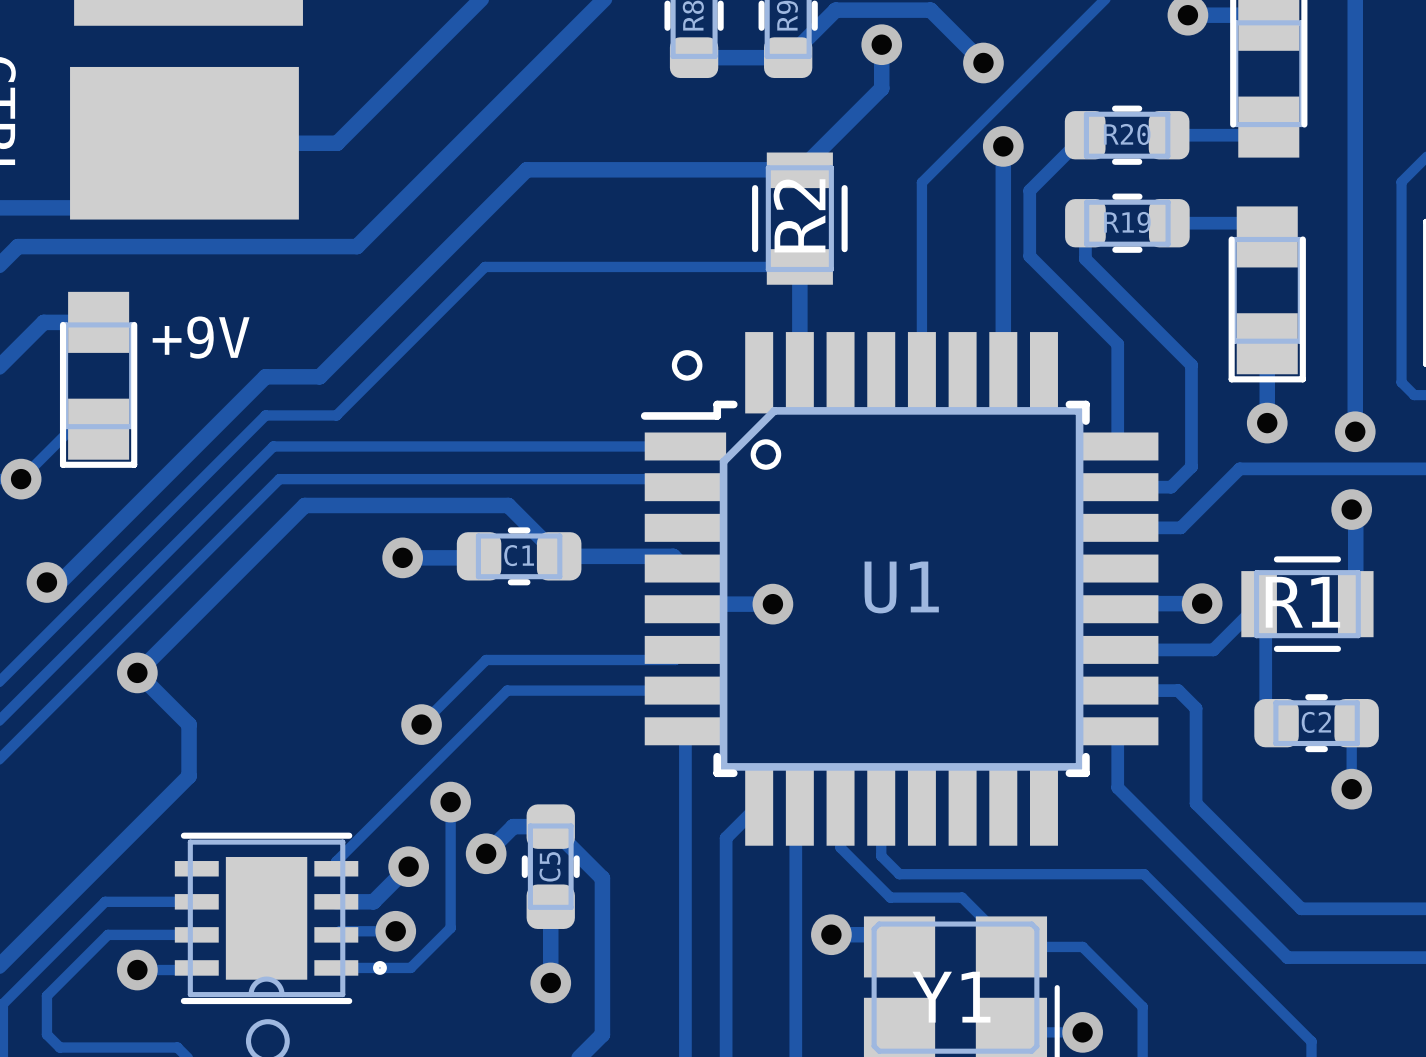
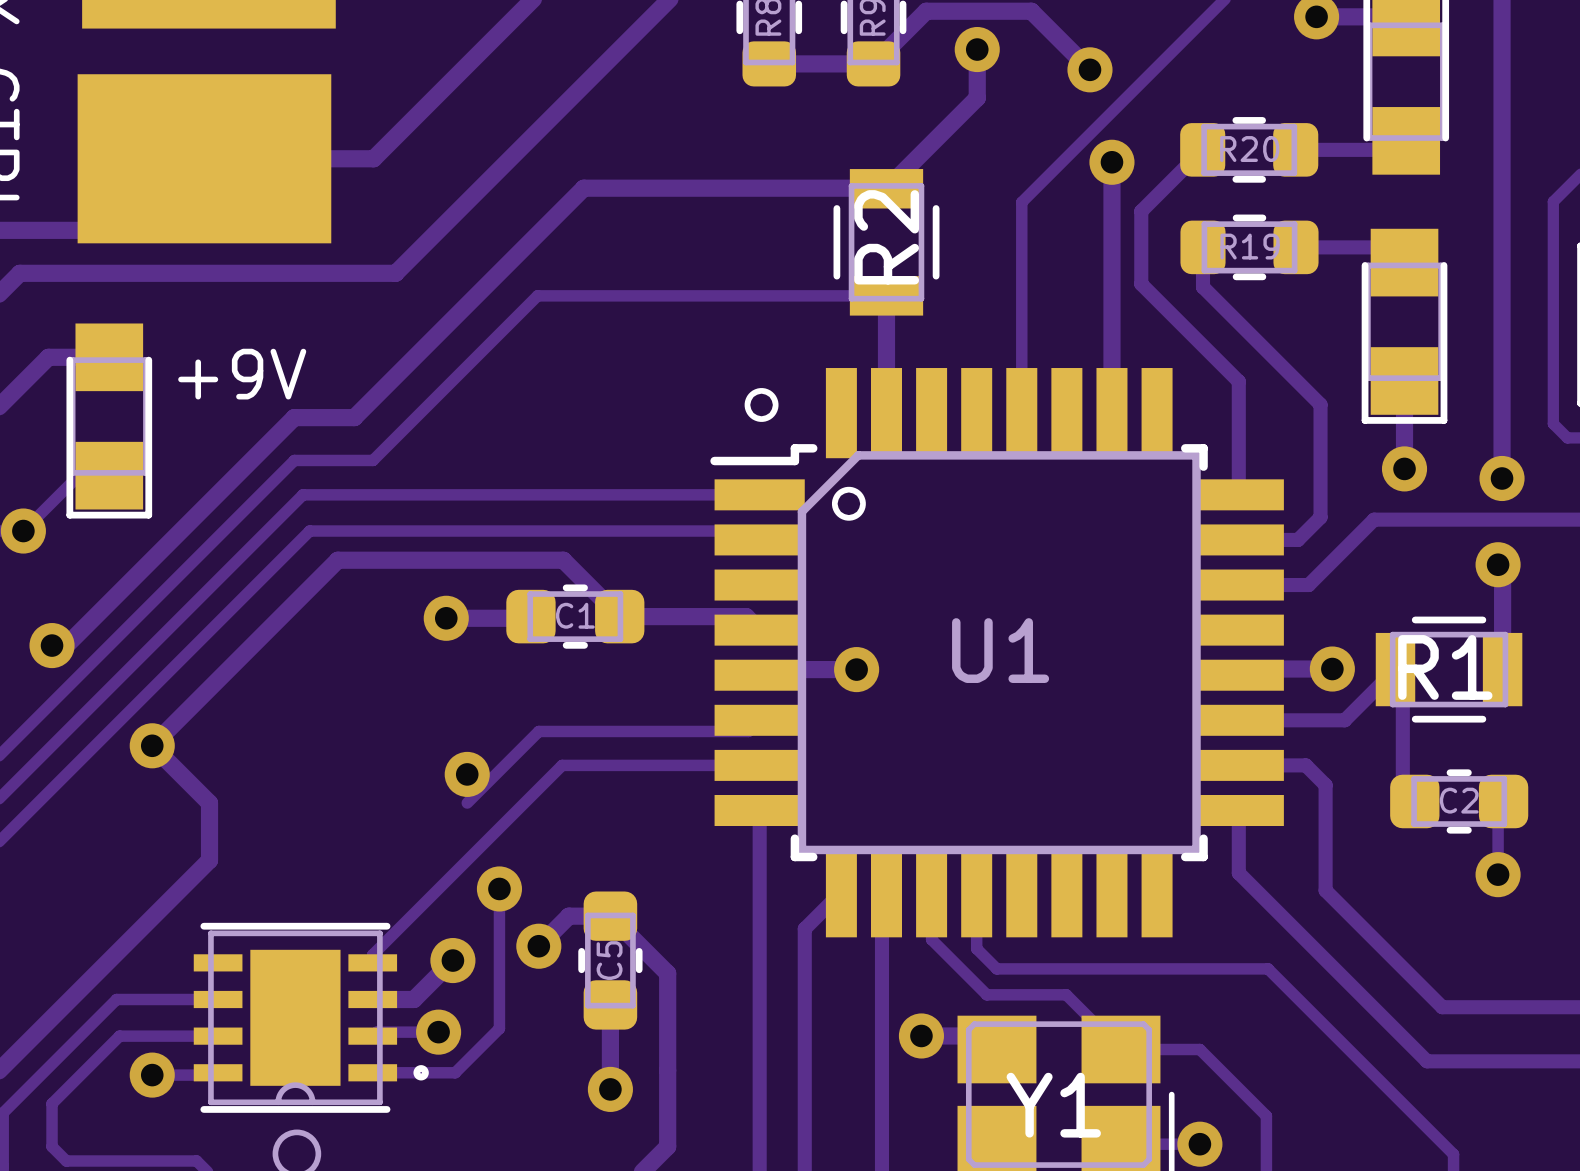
via position: (421, 724) -> (467, 774)

